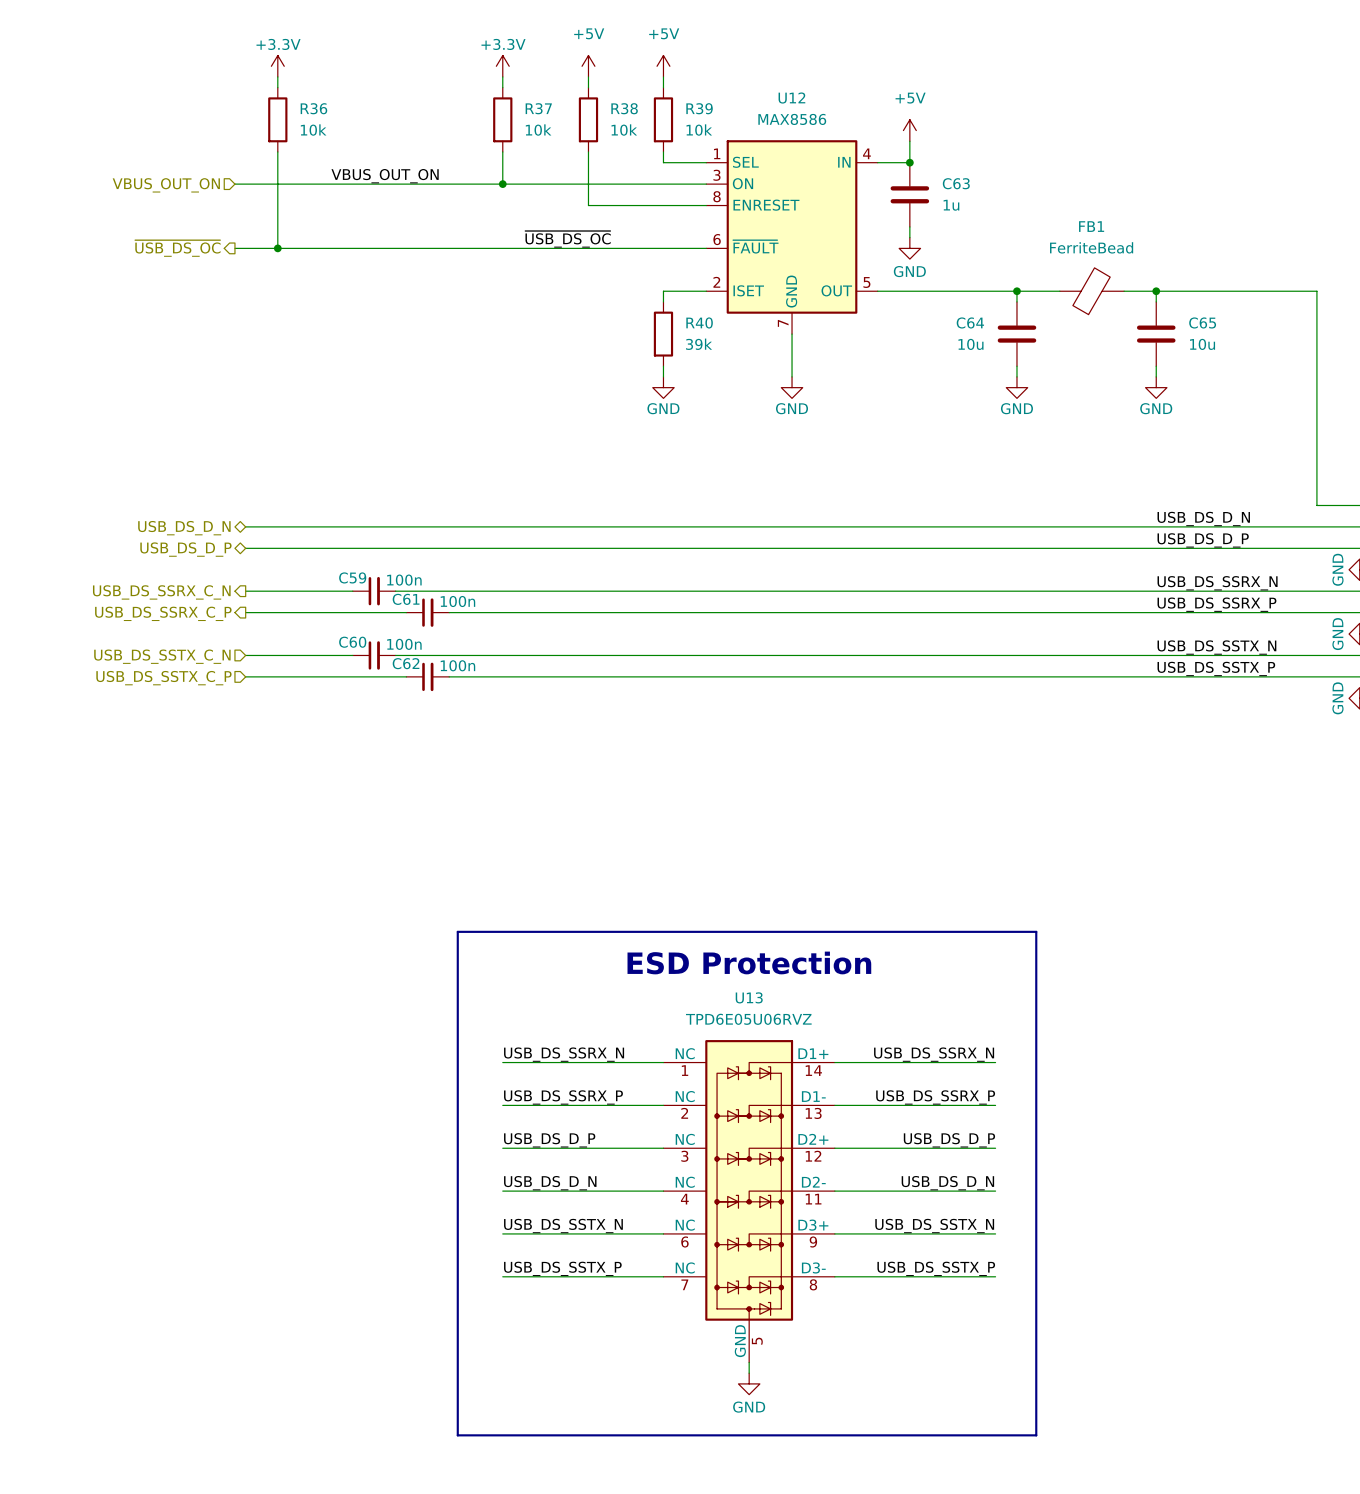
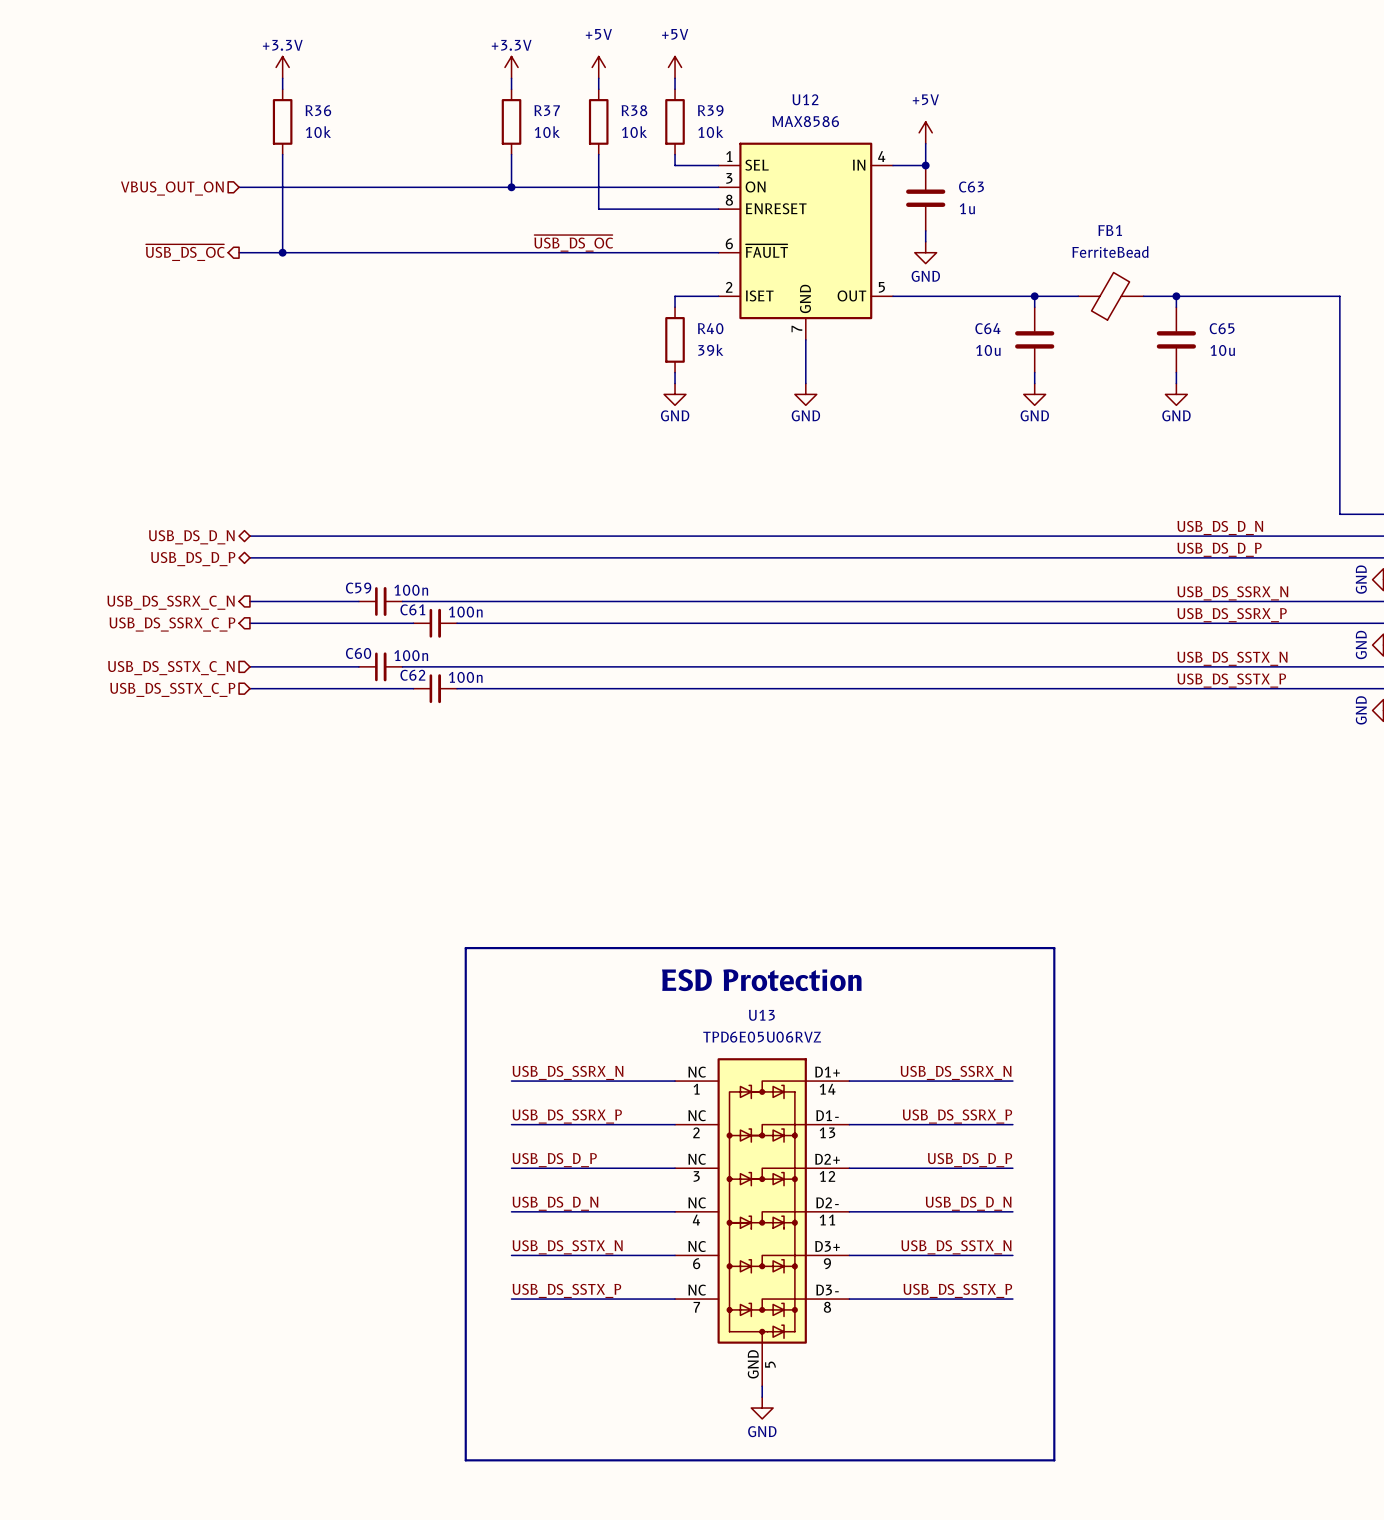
label: VBUS_OUT_ON (385, 176) -> none

